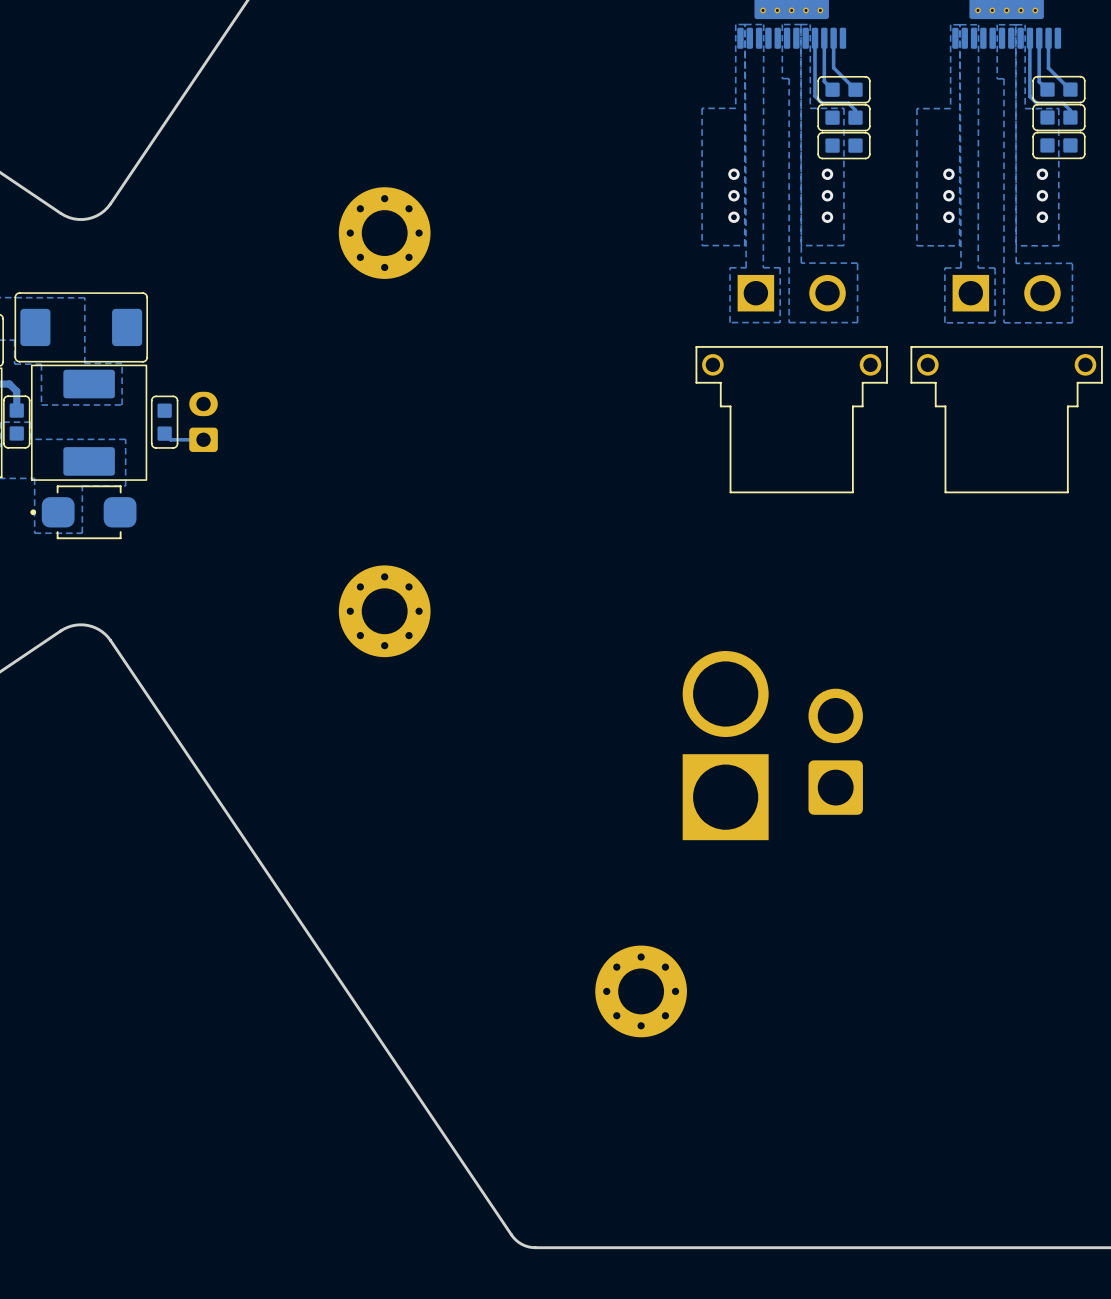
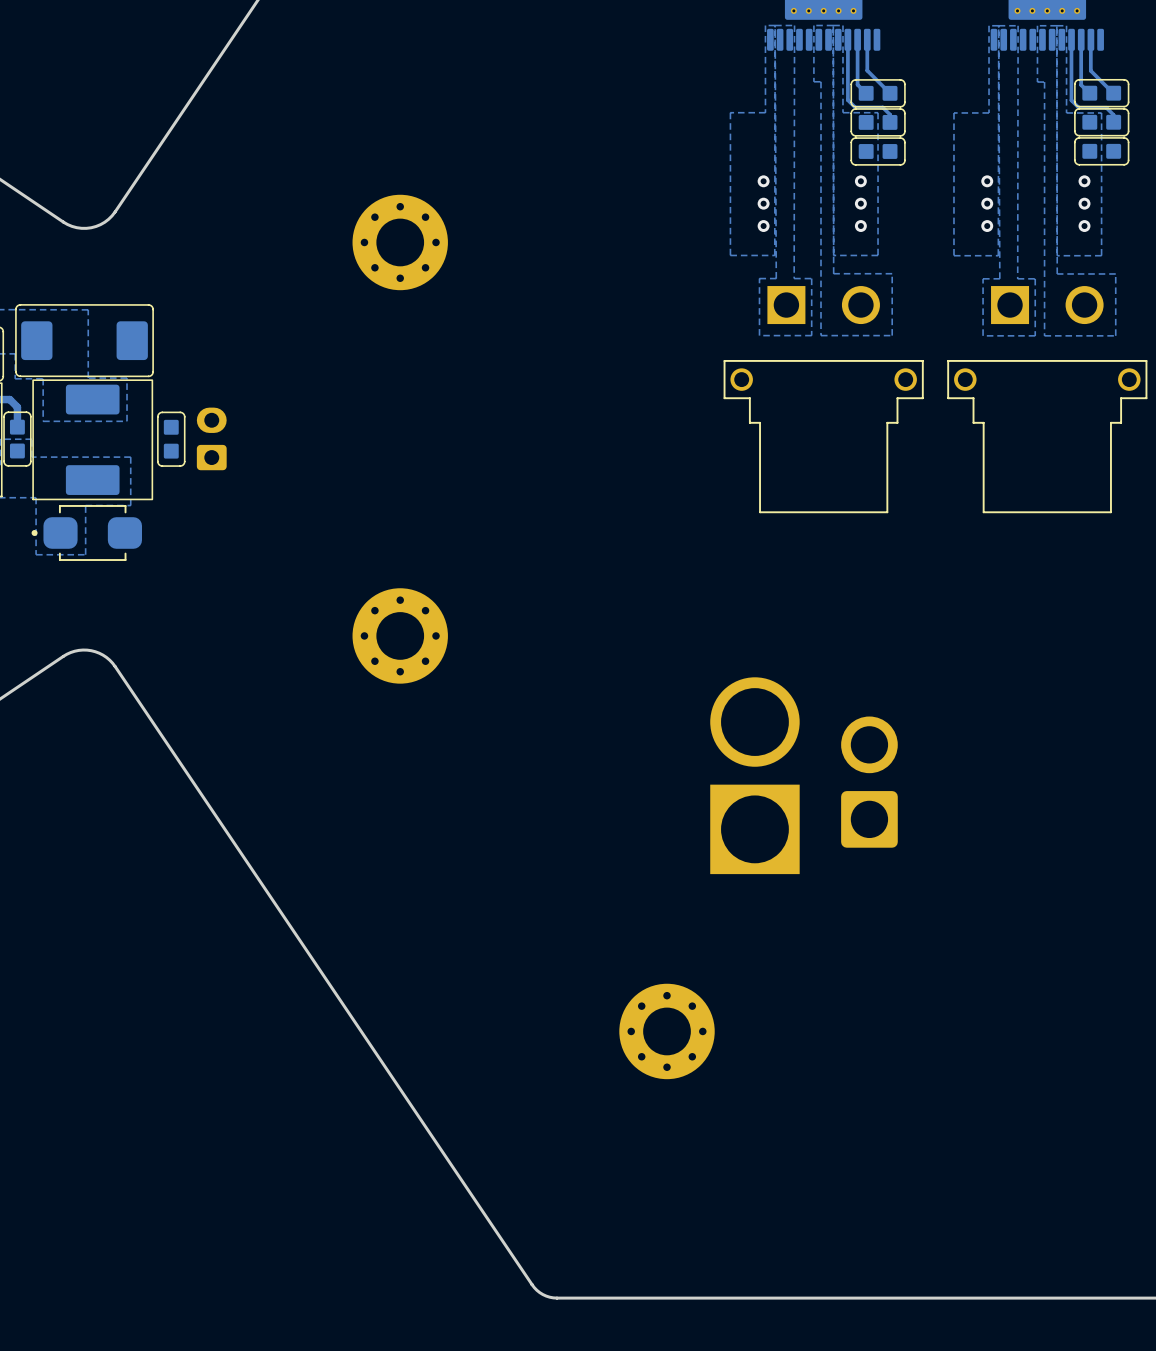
track: (164, 433) (170, 439) (203, 439) -> none

